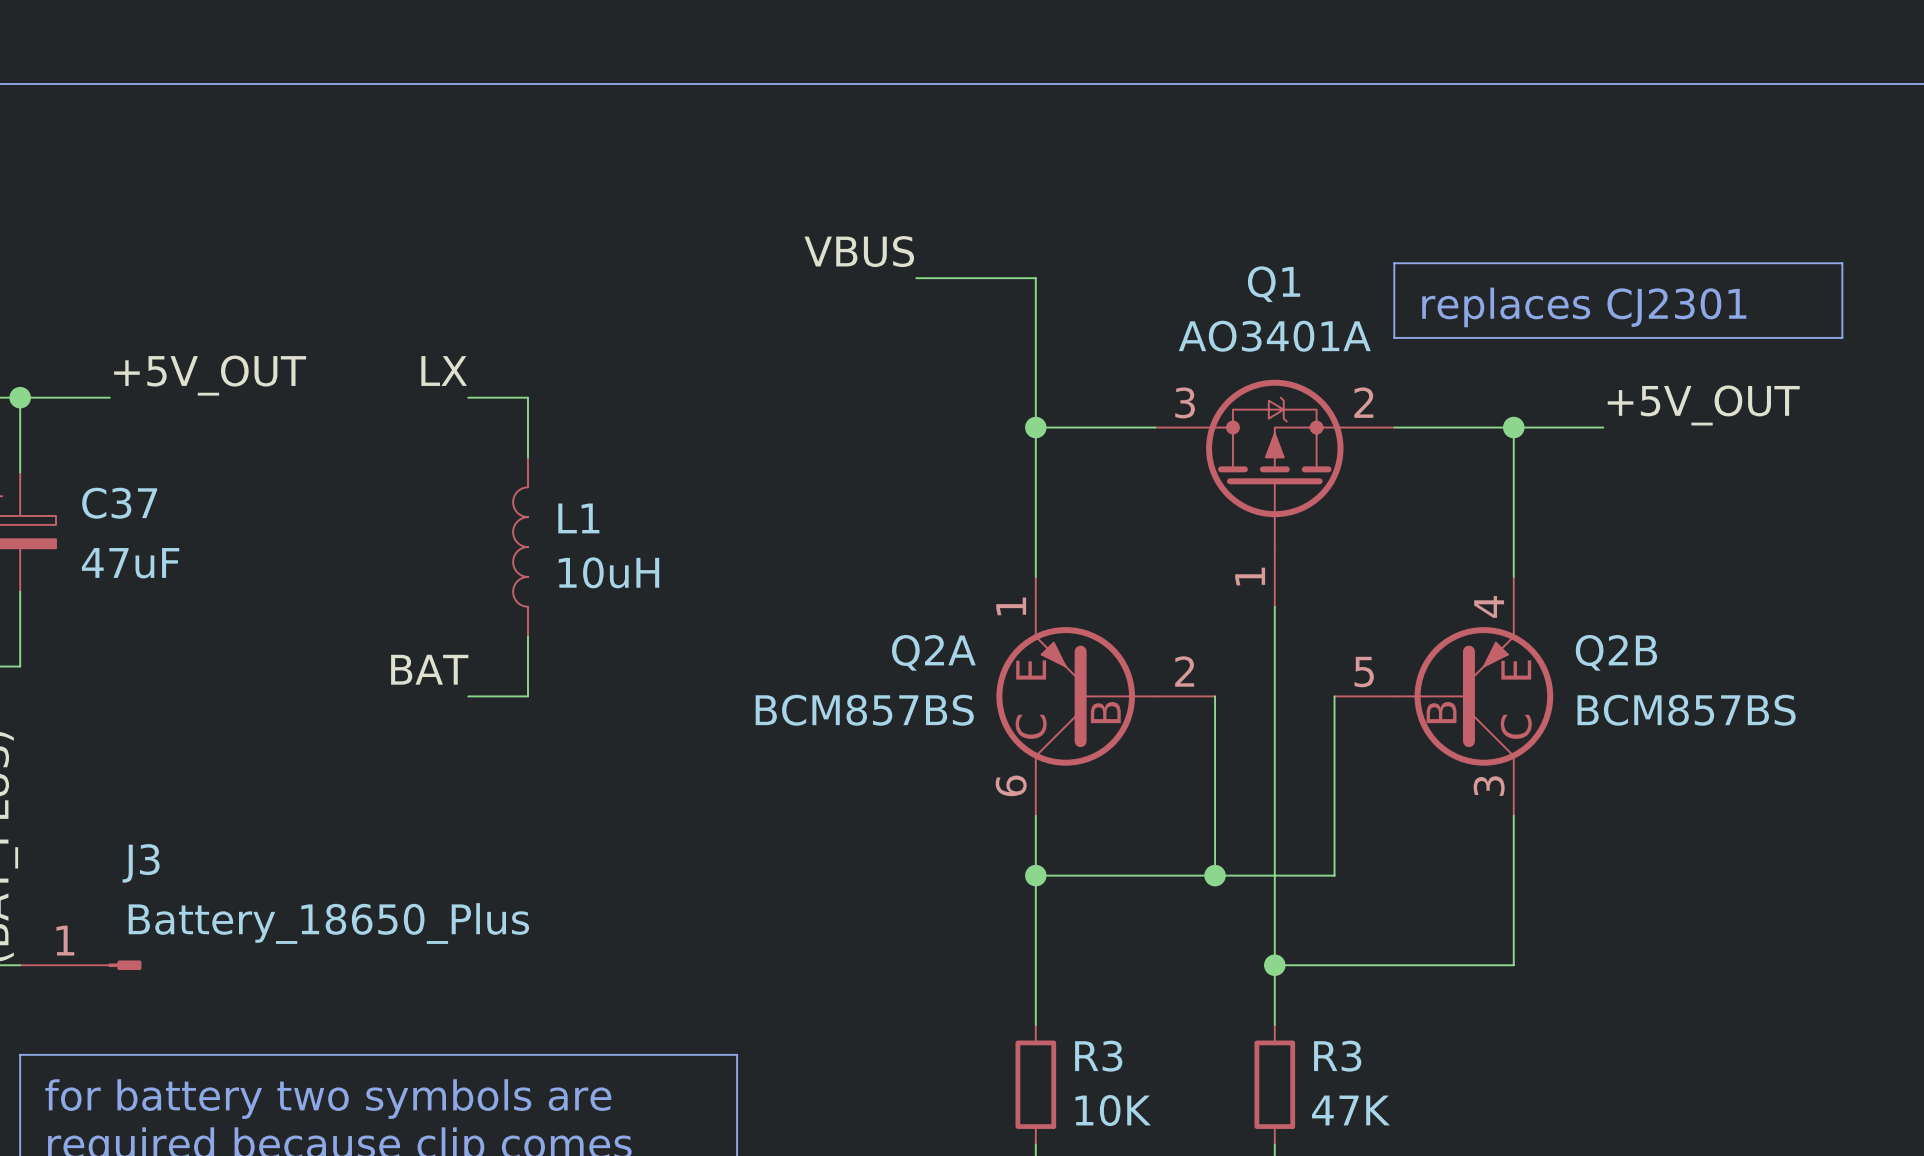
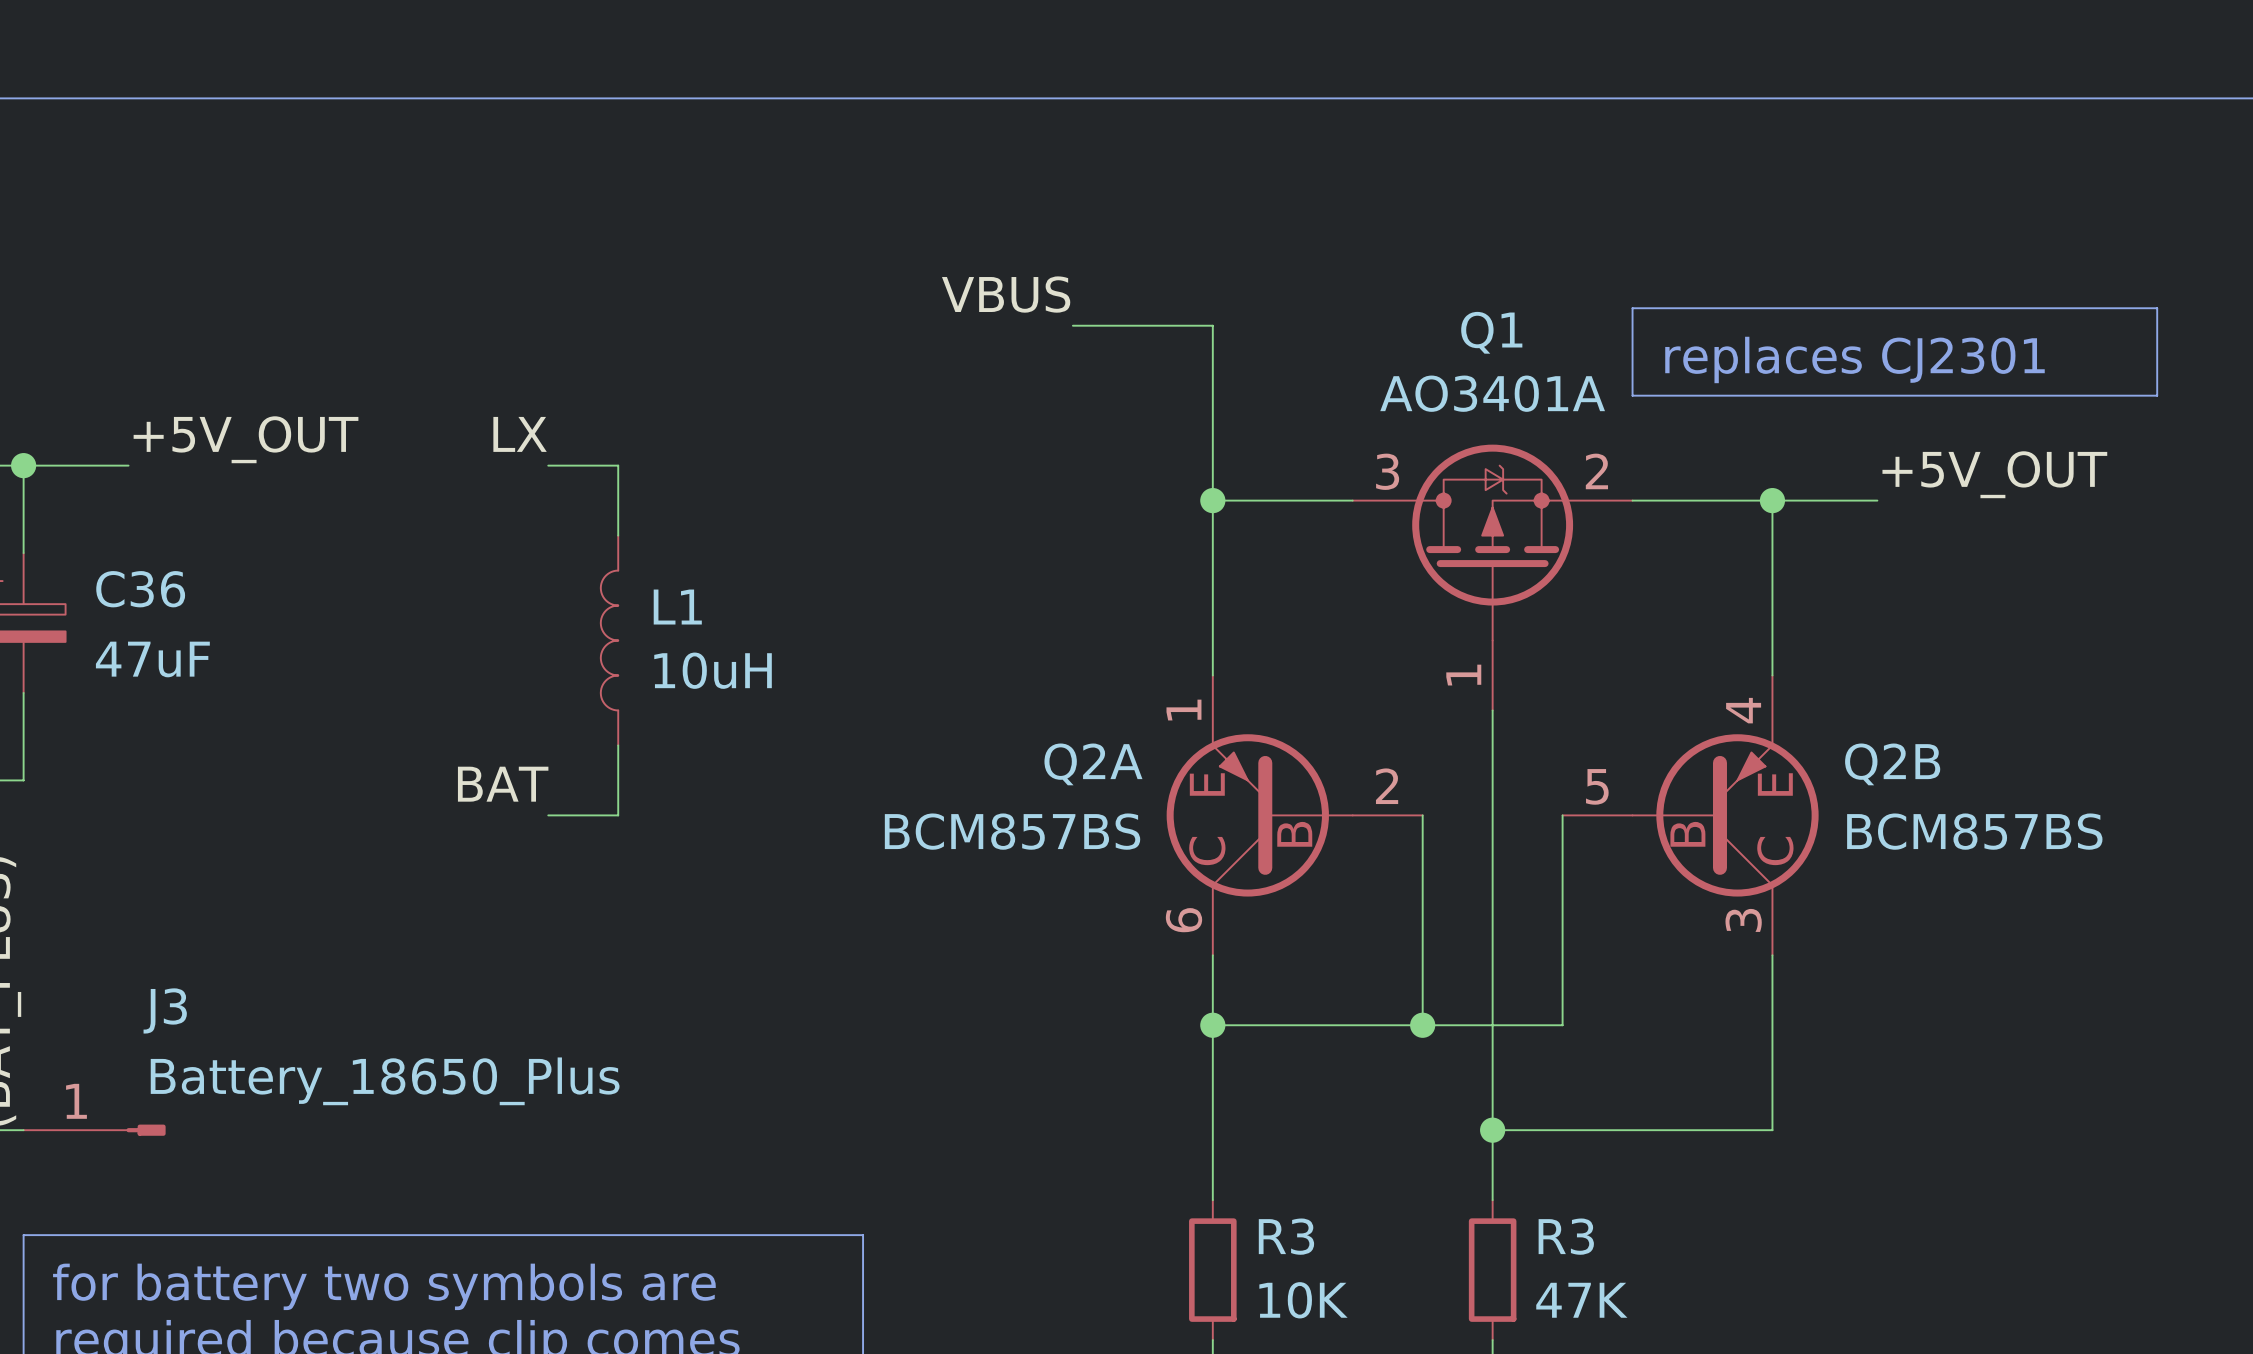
C37 name: C37 (119, 503) -> C36 (140, 589)

